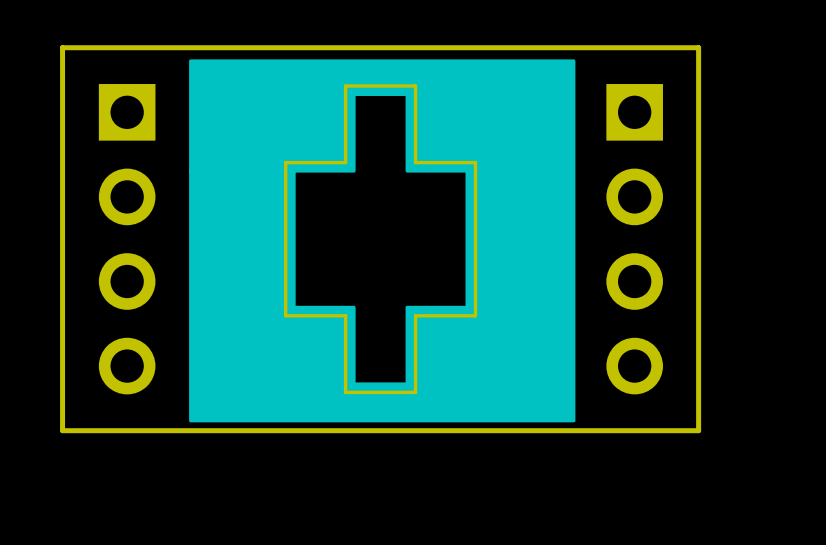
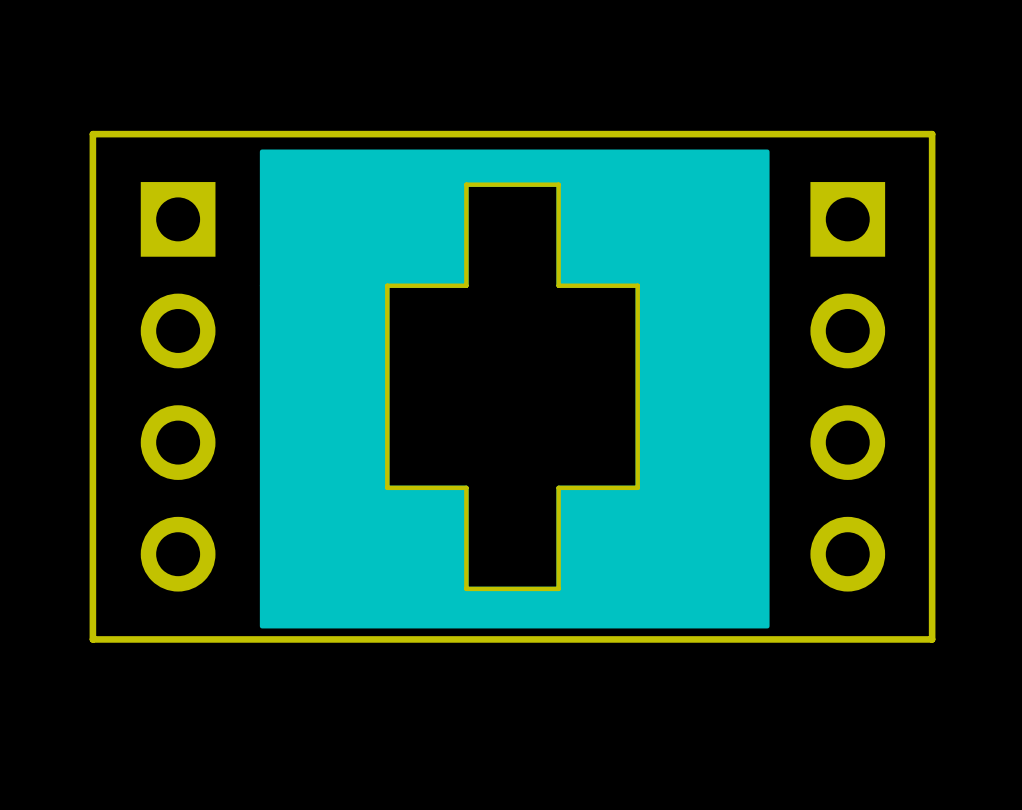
drawing shape: [189, 59, 576, 423] -> [259, 149, 770, 629]

